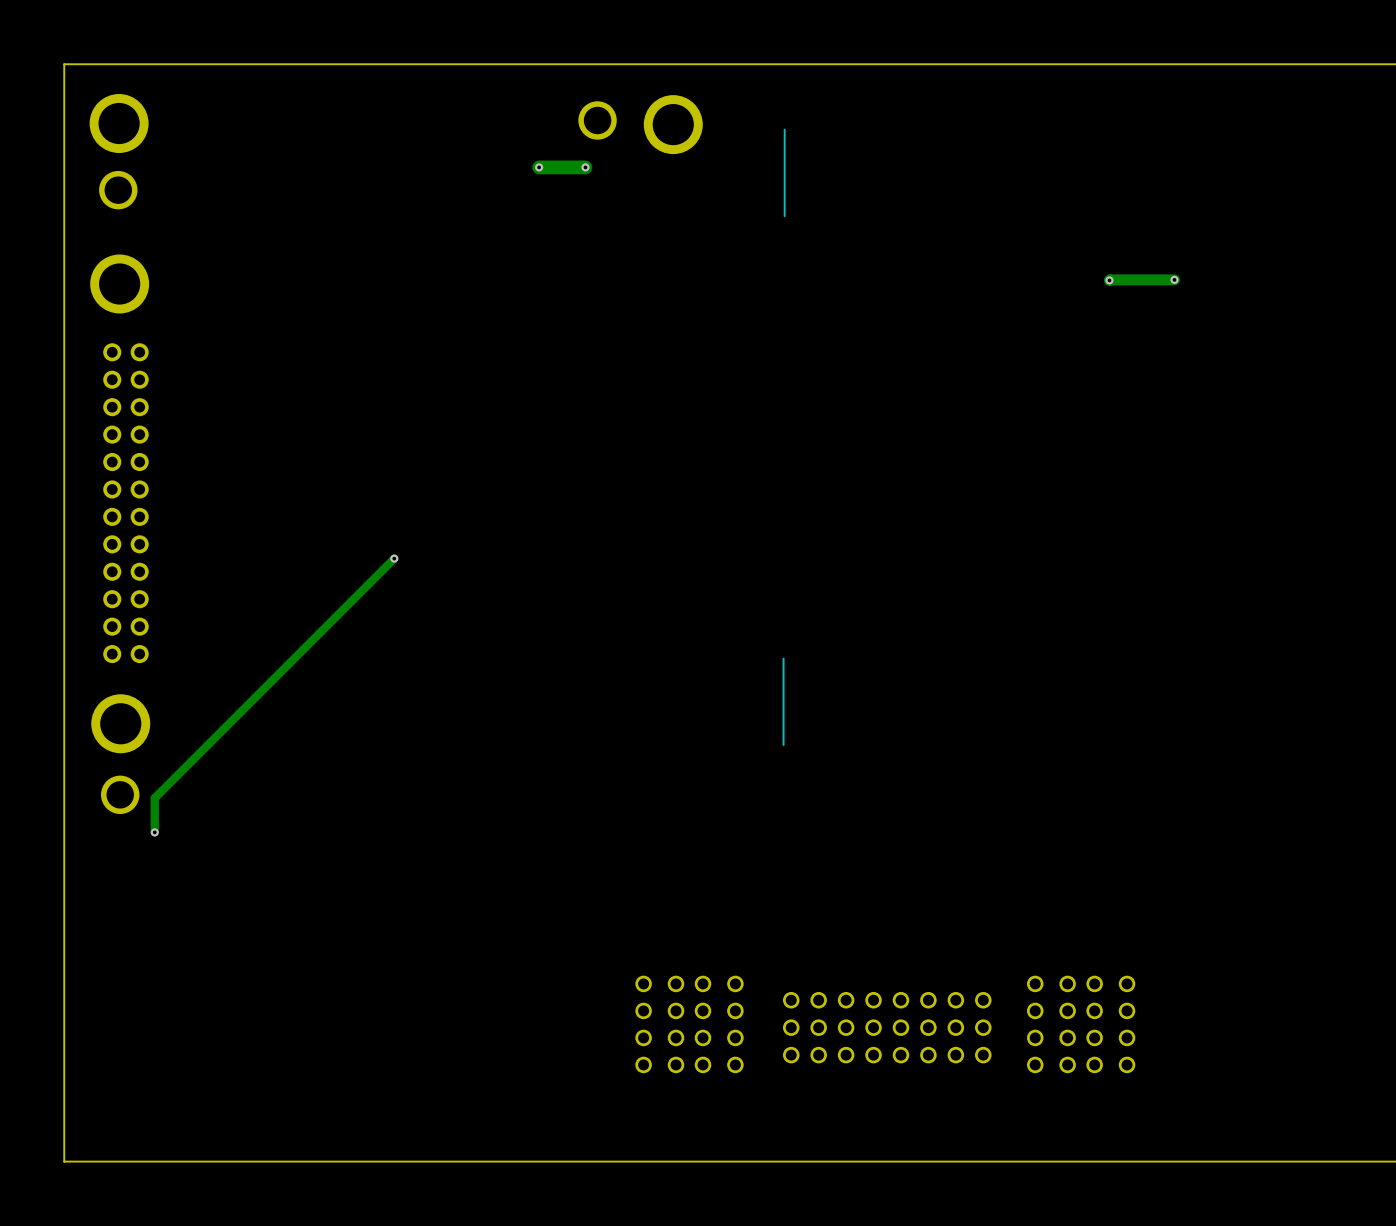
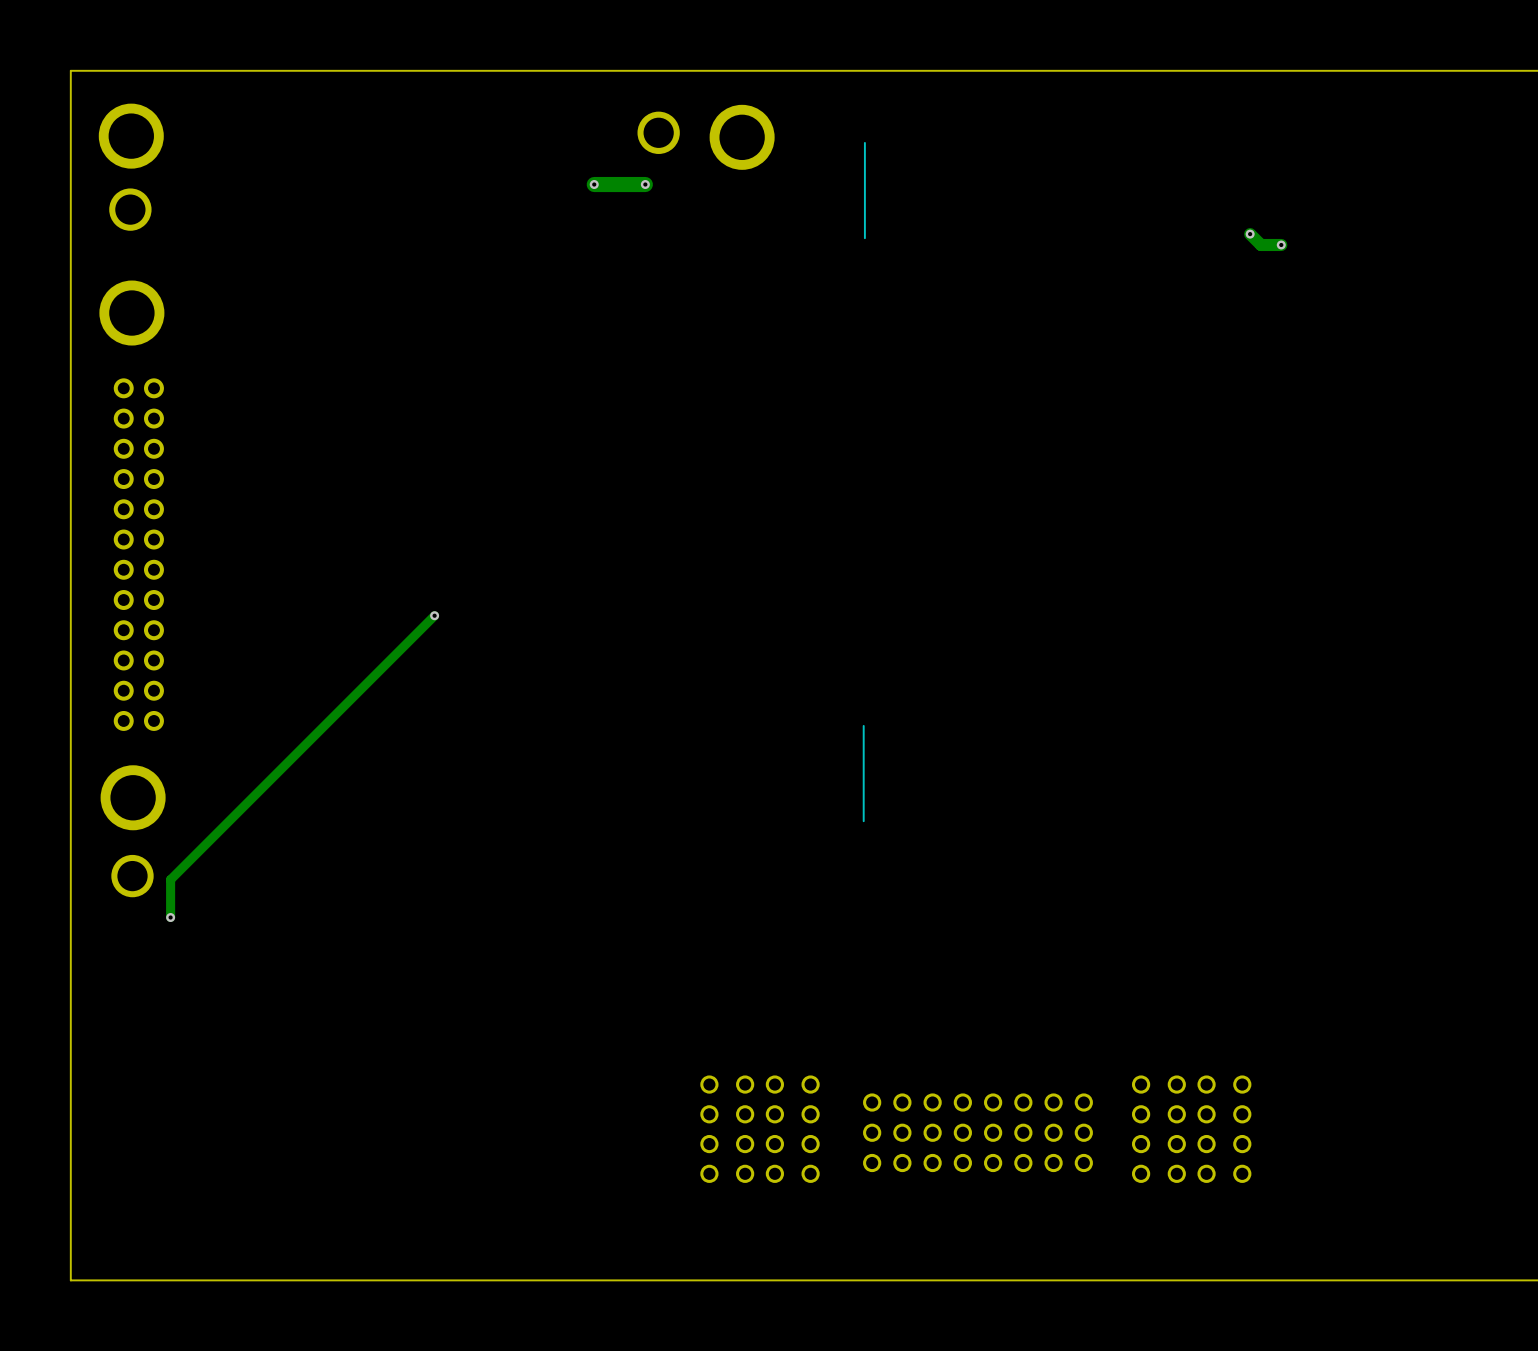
track: none -> (1250, 234) (1261, 244) (1281, 244)
via: none -> (1250, 234)
via: none -> (1281, 244)
track: (1174, 279) (1109, 280) -> none
via: (1174, 279) -> none
via: (1109, 280) -> none

